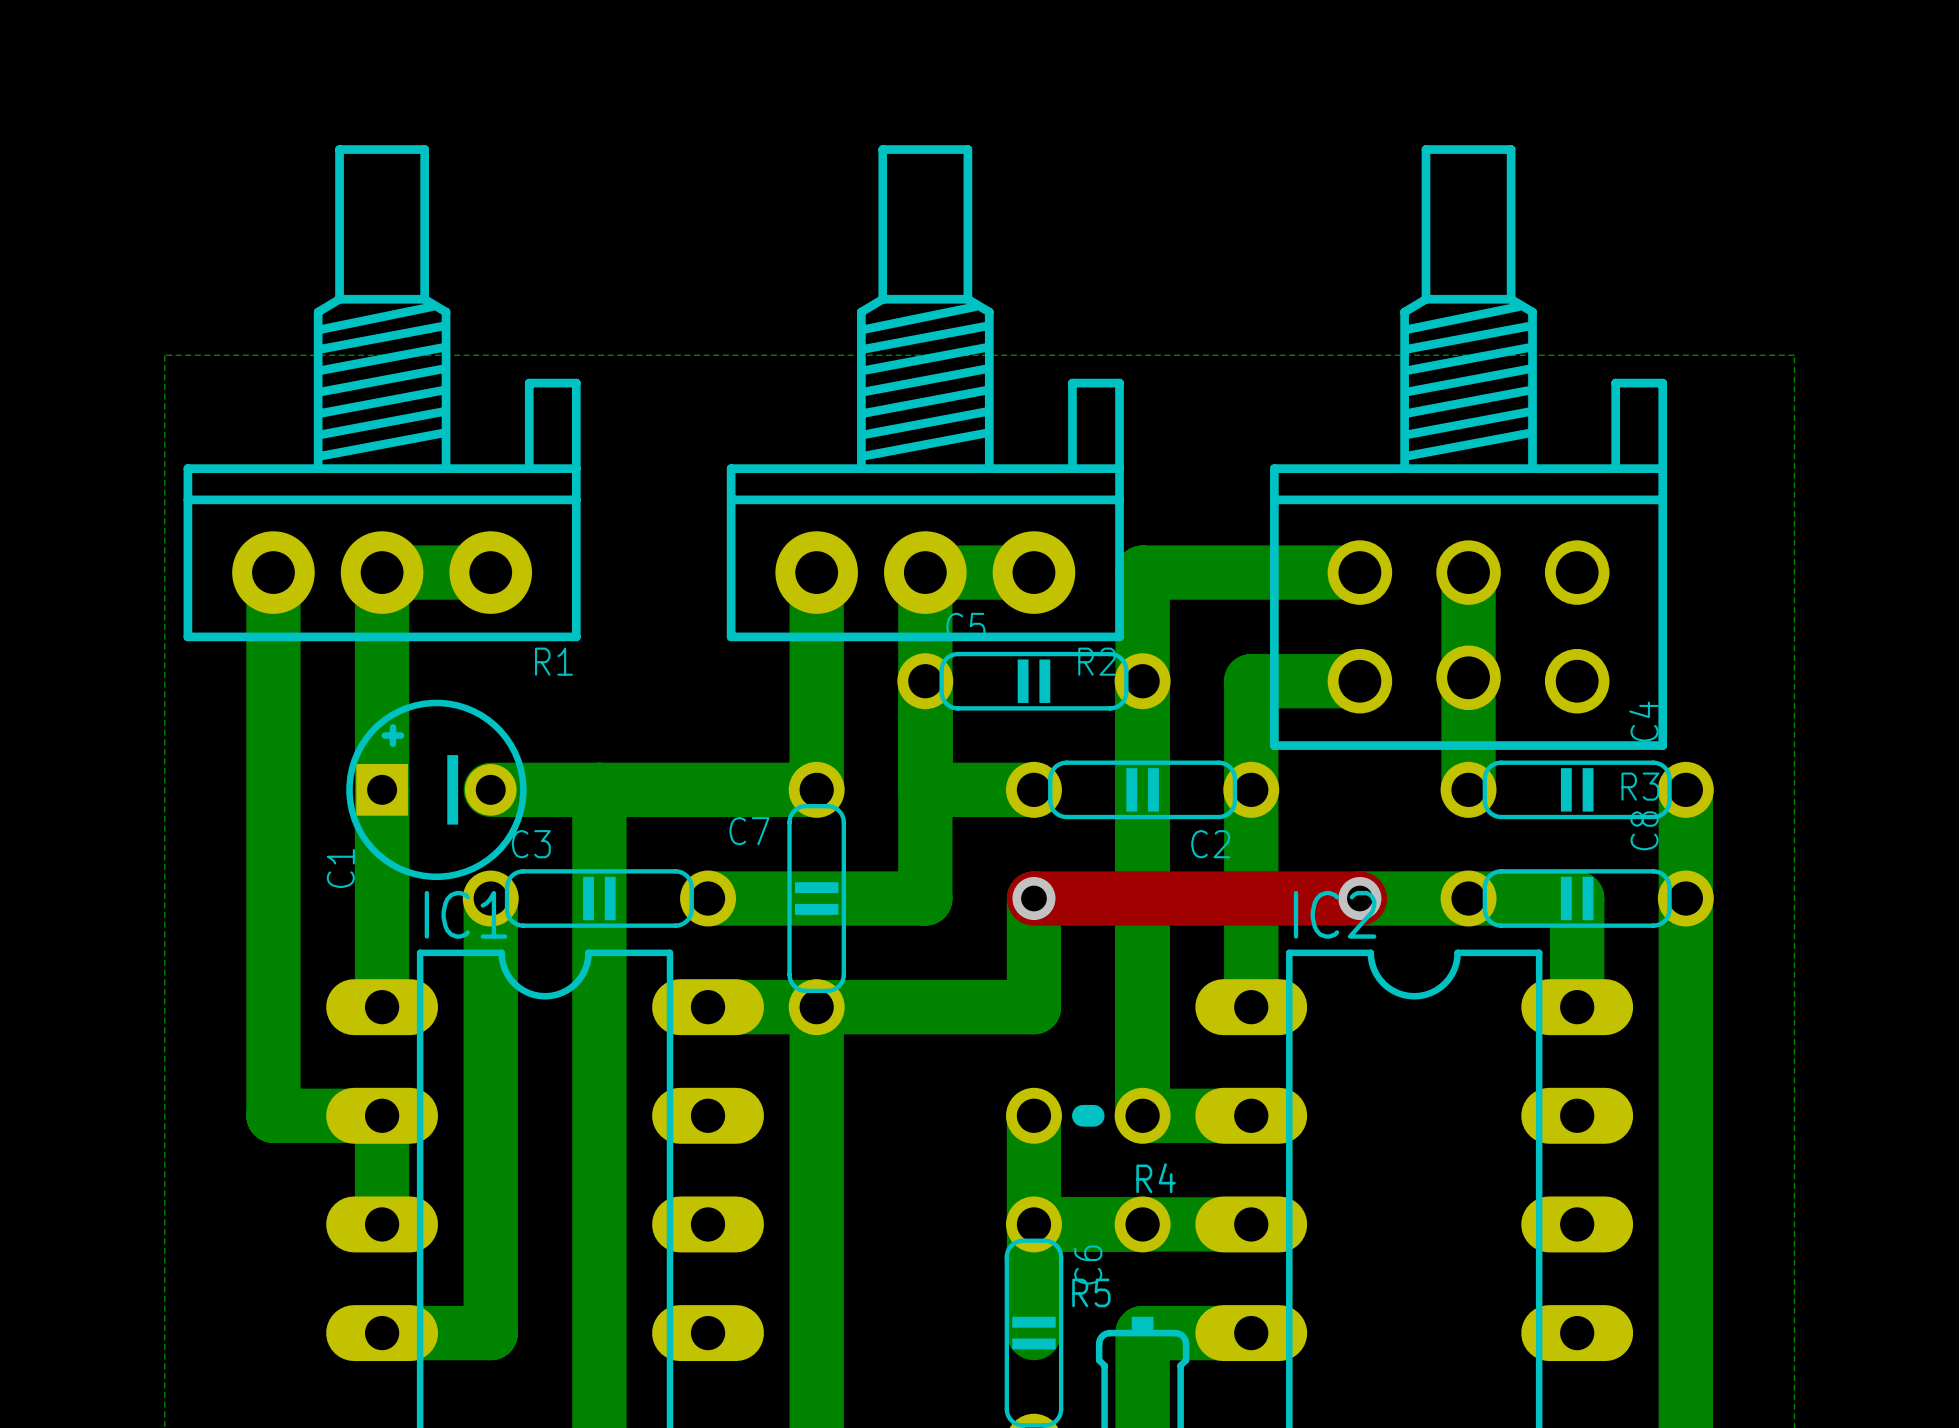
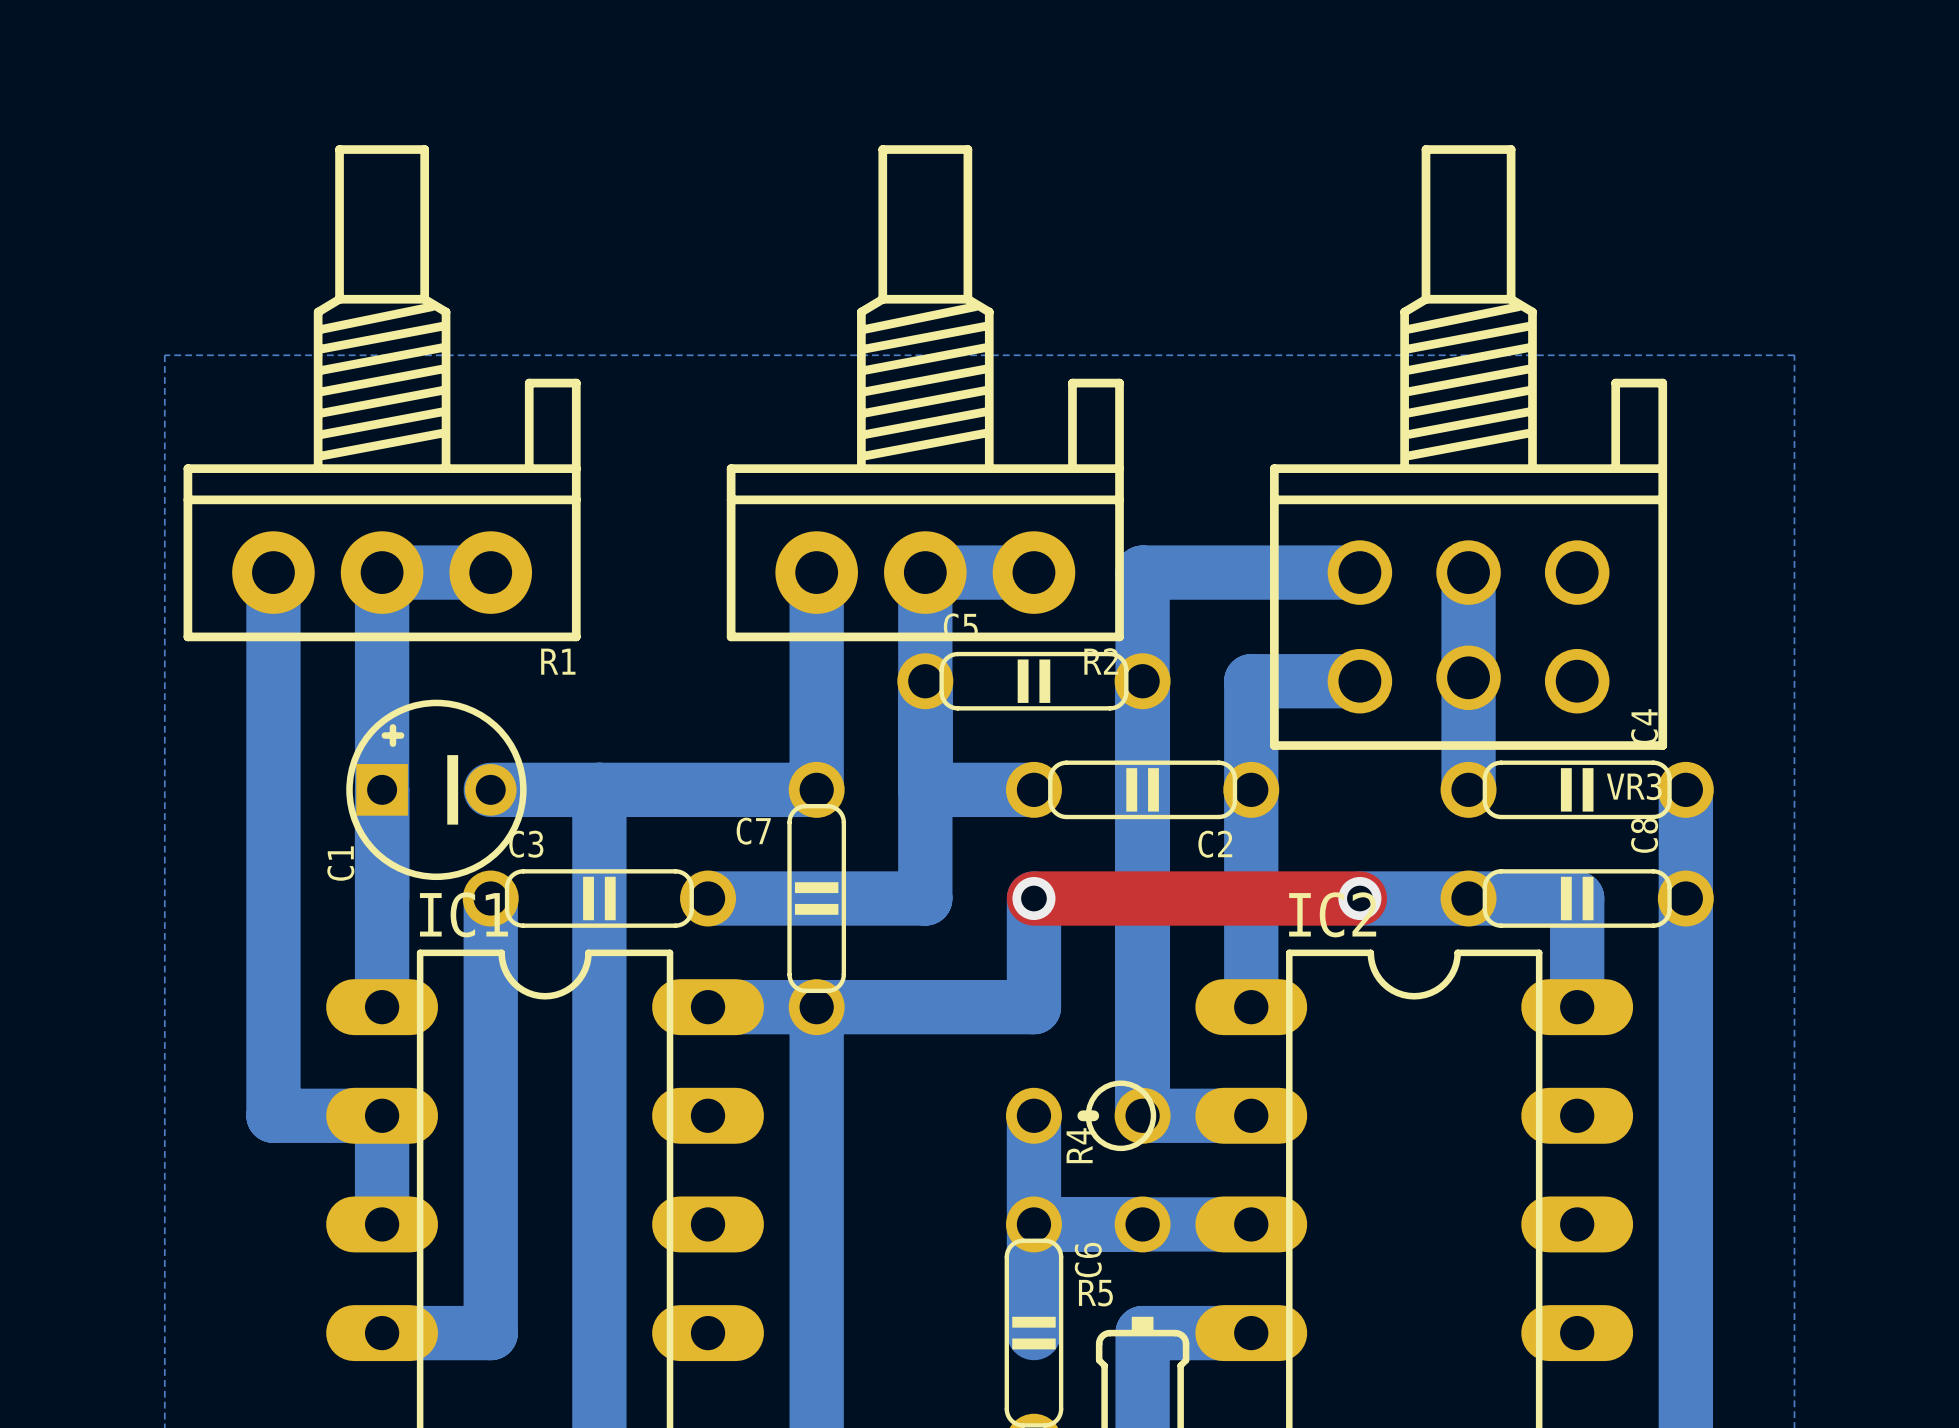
R3 name: R3 (1640, 786) -> VR3 (1634, 786)
R4 footprint: [1005, 1087, 1171, 1144] -> [1005, 1080, 1171, 1152]

